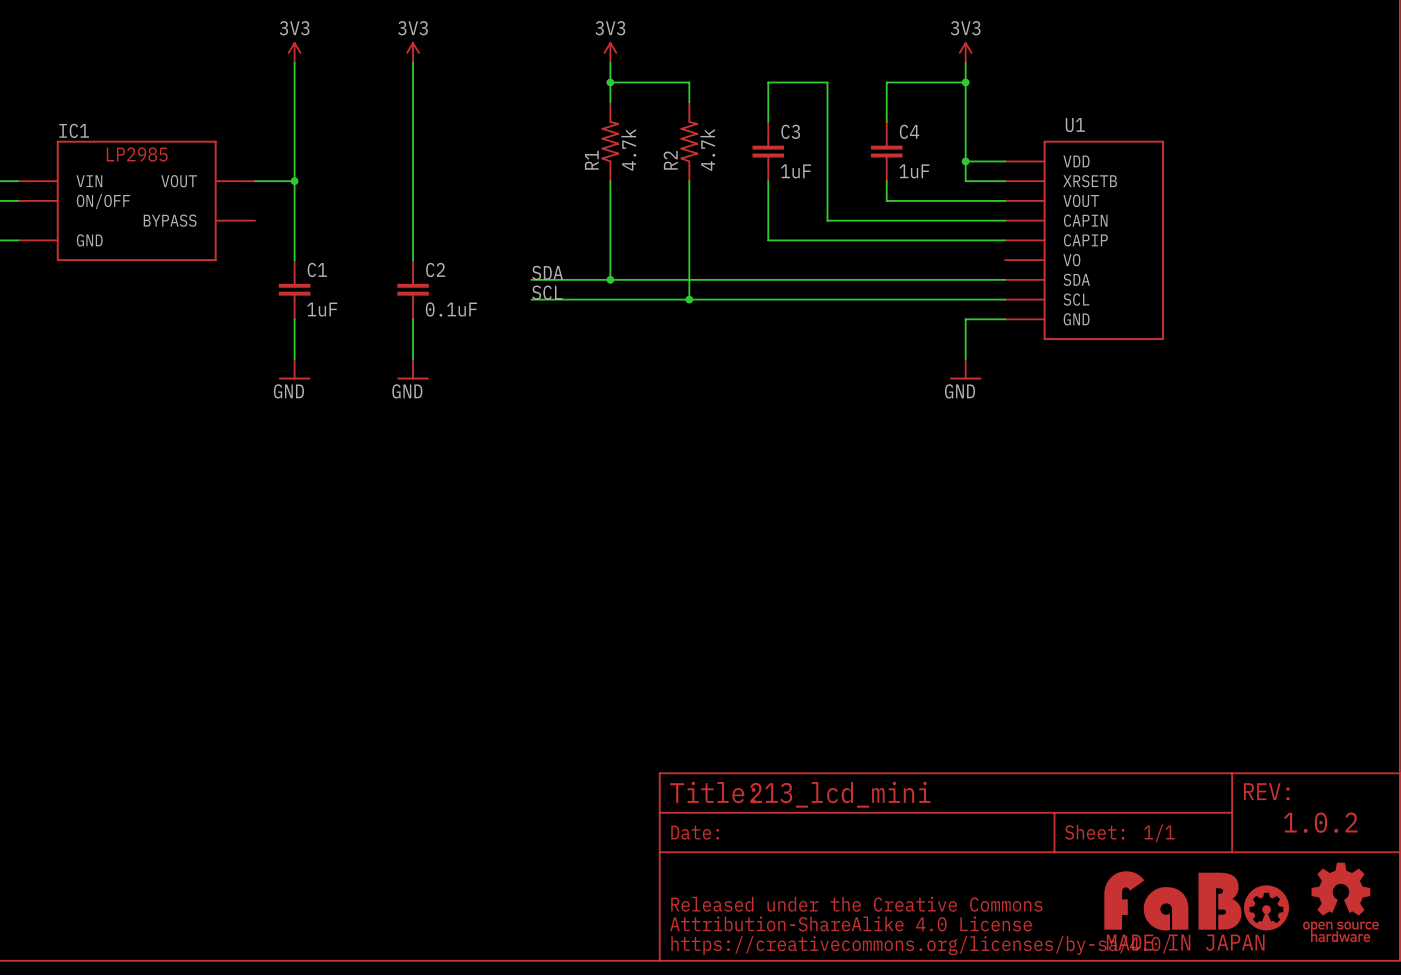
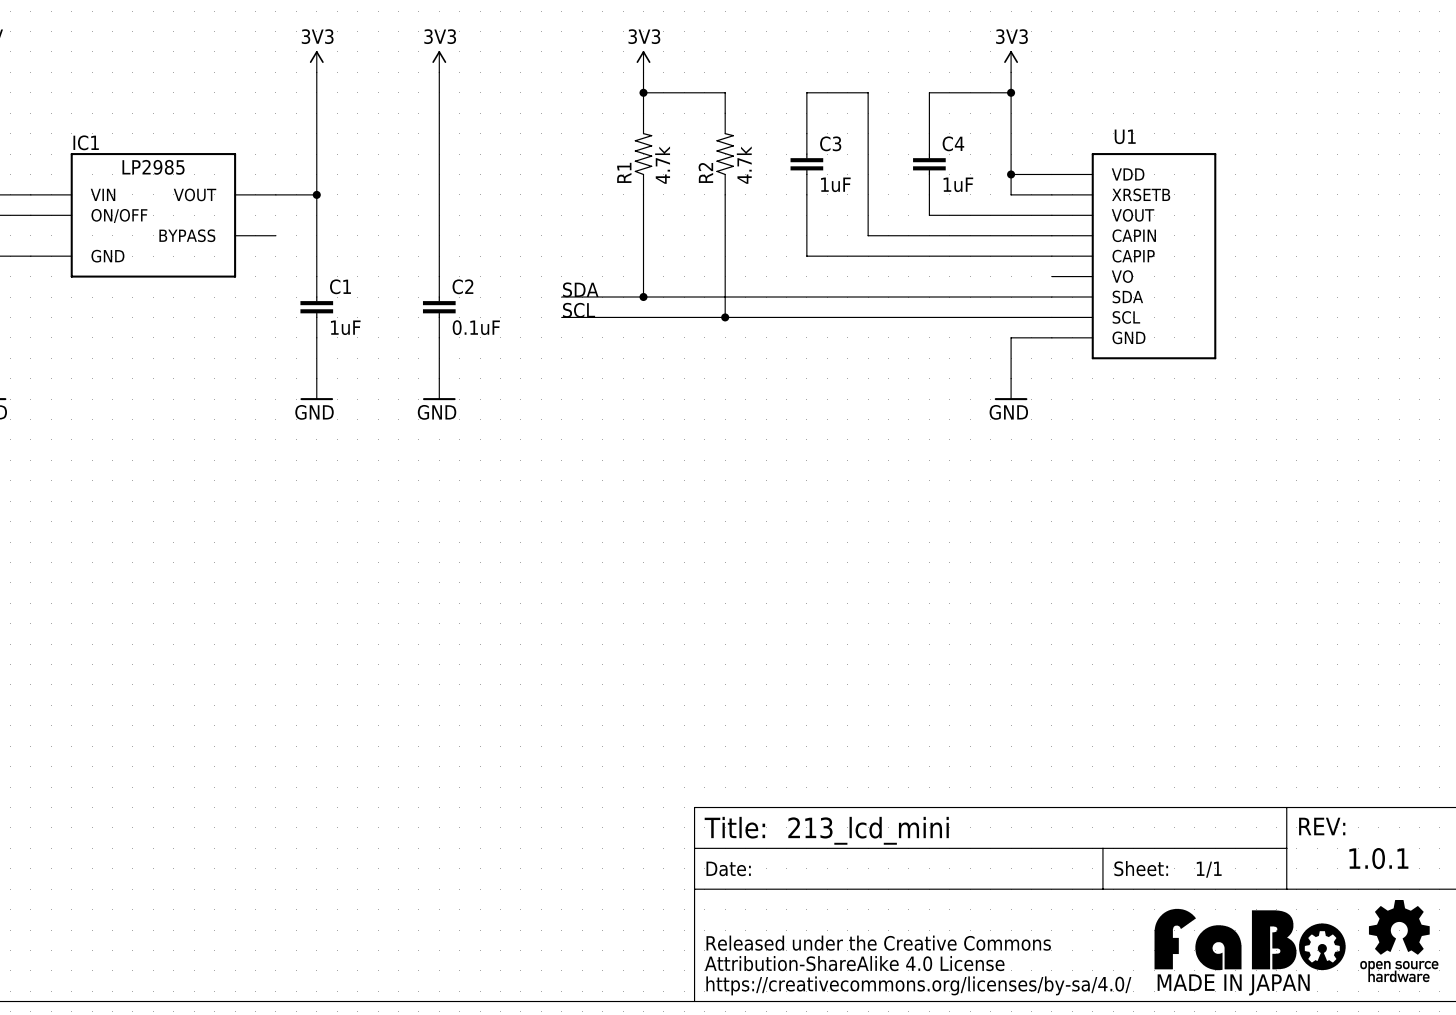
text: 1.0.2 (1320, 822) -> 1.0.1 (1378, 858)

